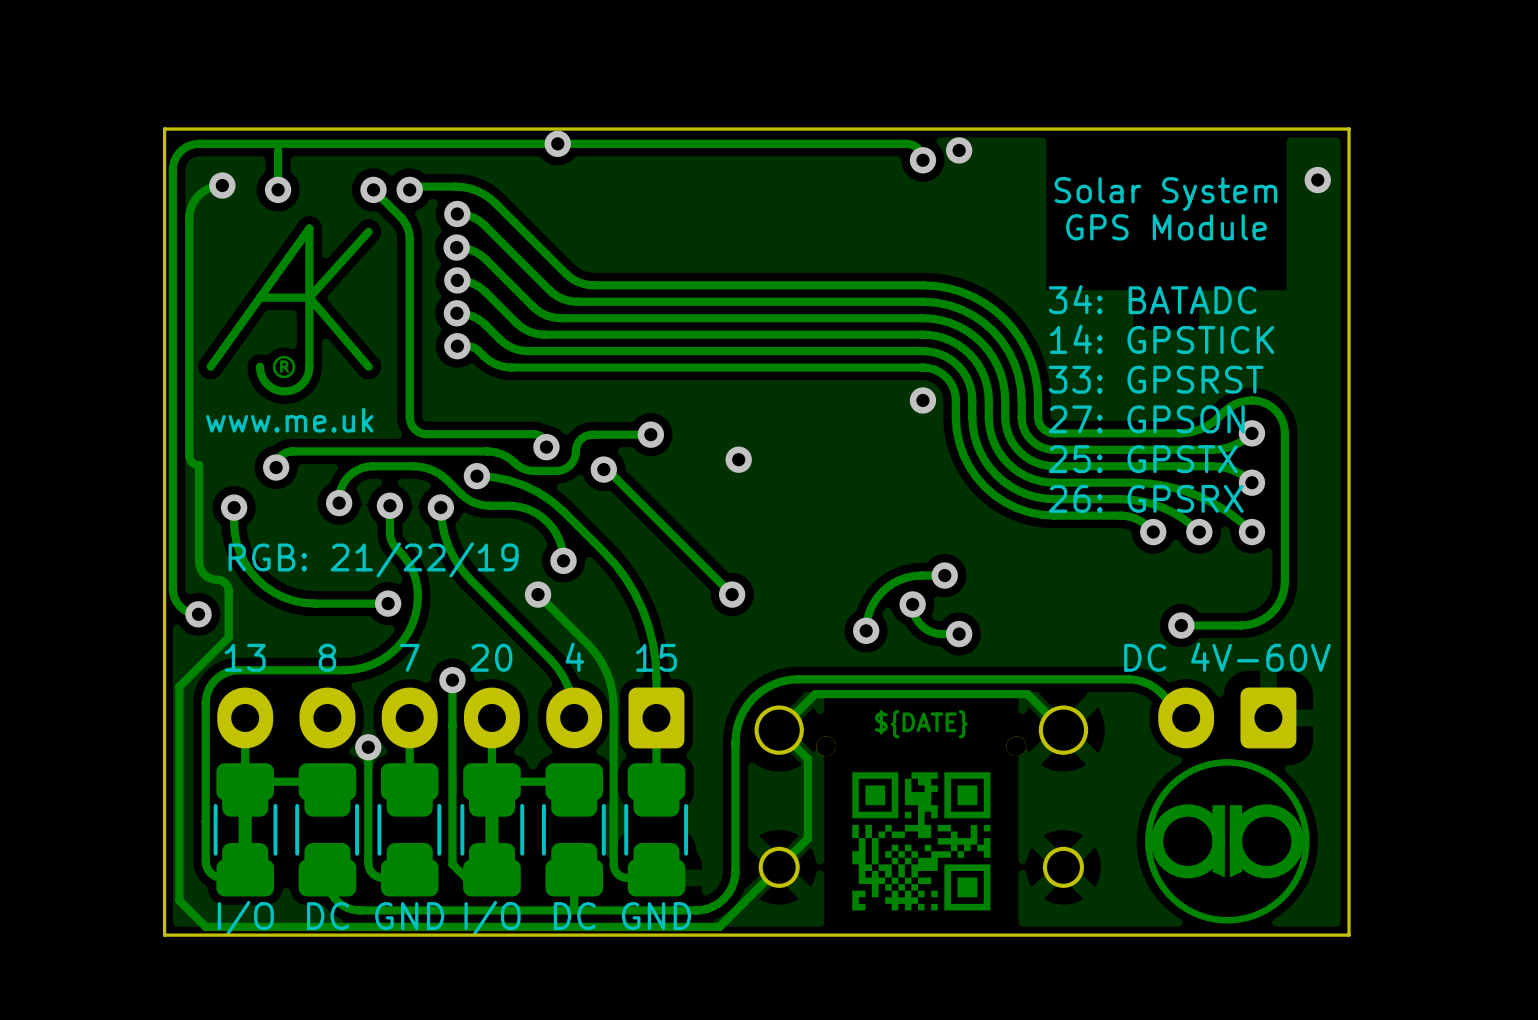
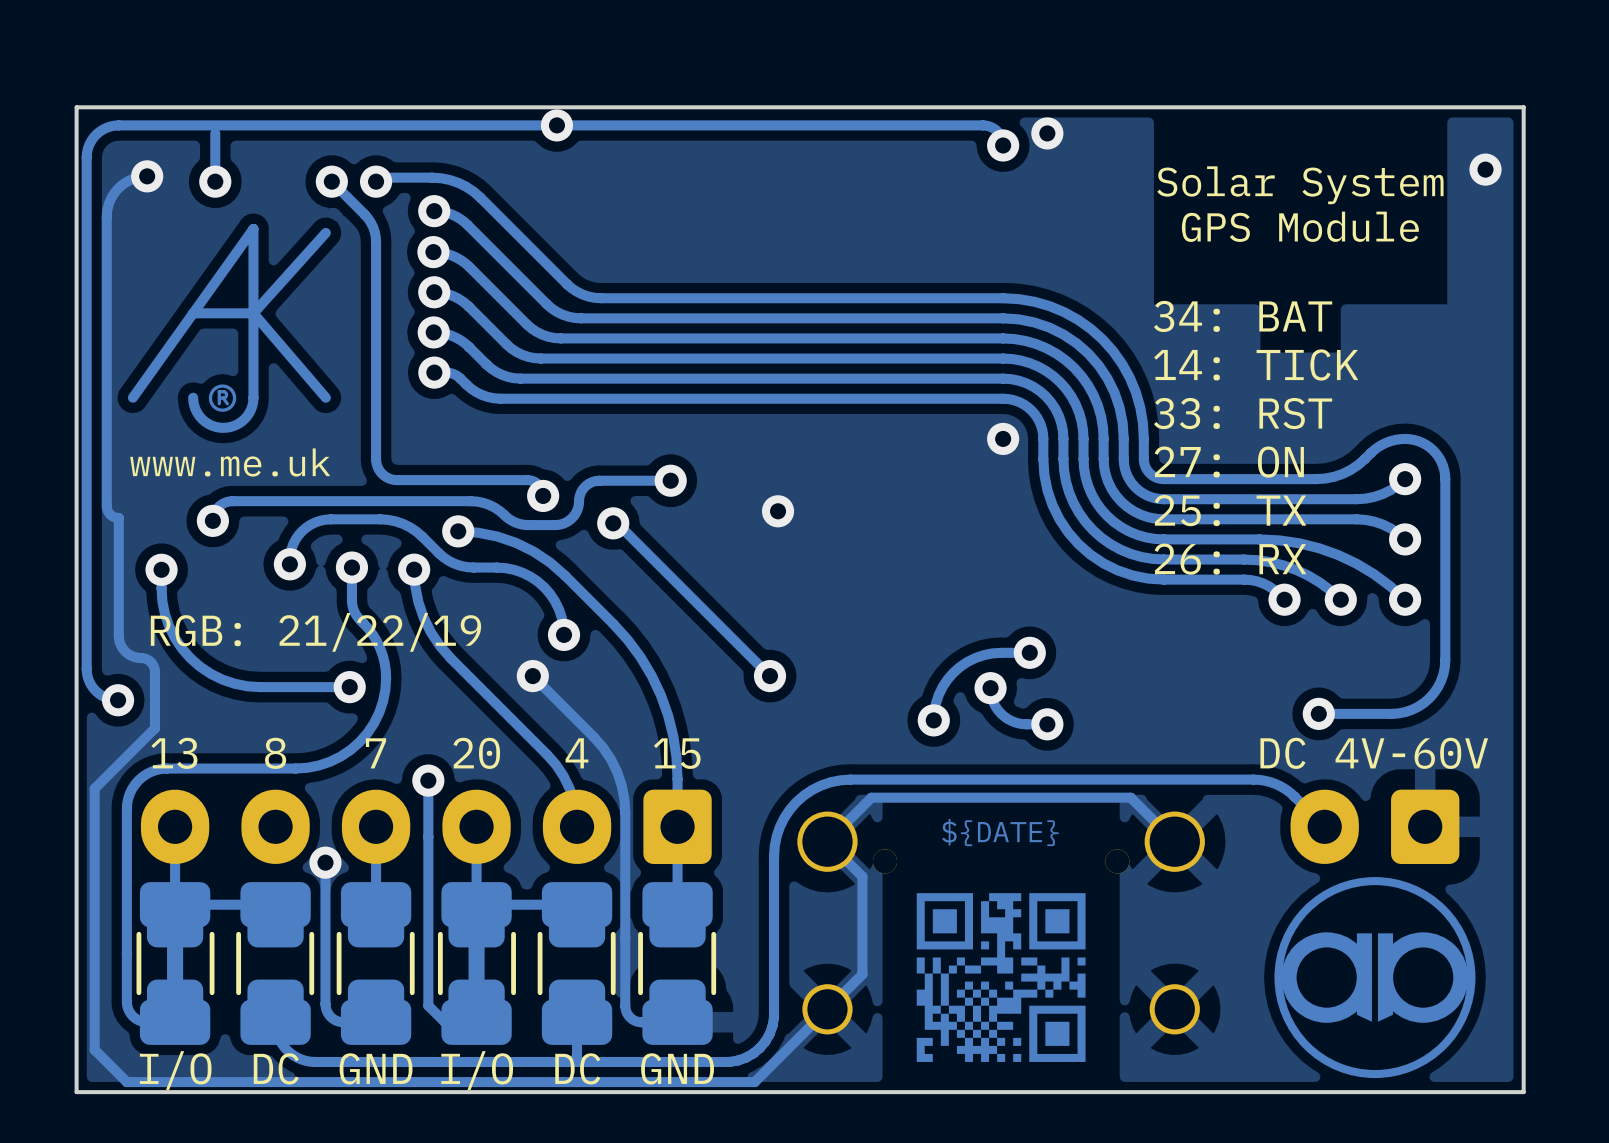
text: 34: BATADC (1152, 299) -> 34: BAT (1243, 316)
text: 14: GPSTICK (1162, 339) -> 14: TICK (1256, 365)
text: 33: GPSRST (1156, 379) -> 33: RST (1243, 413)
text: 27: GPSON (1146, 419) -> 27: ON (1229, 462)
text: 25: GPSTX (1143, 459) -> 25: TX (1230, 510)
text: 26: GPSRX (1146, 498) -> 26: RX (1230, 559)

